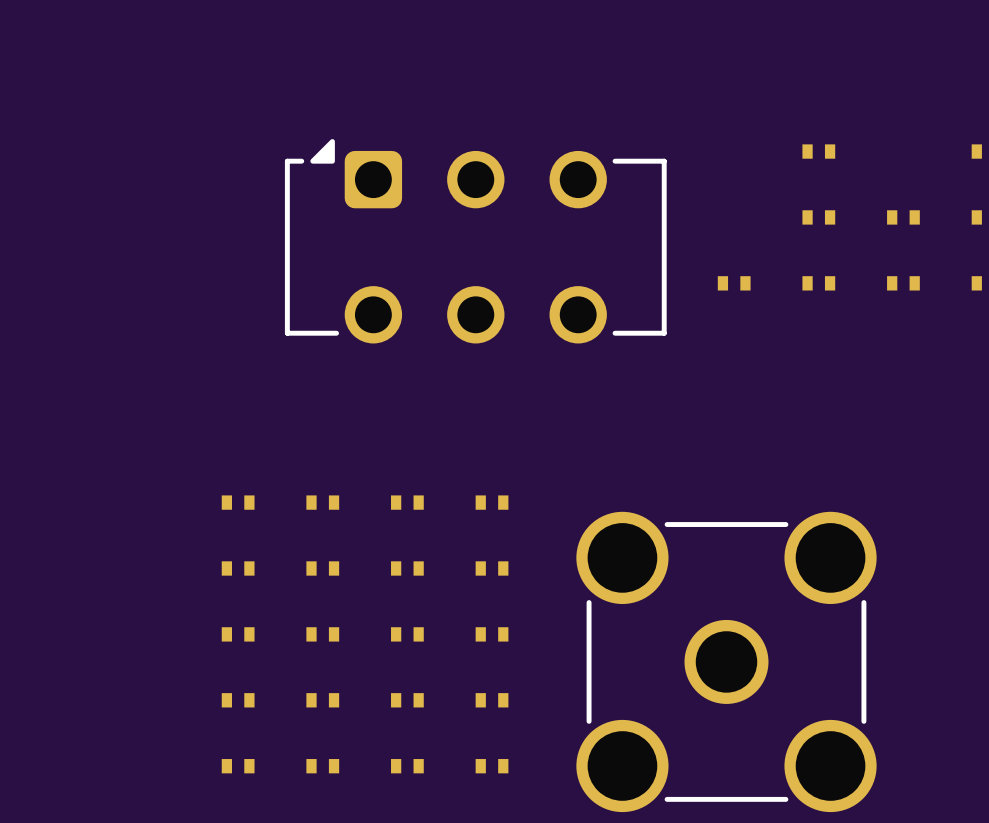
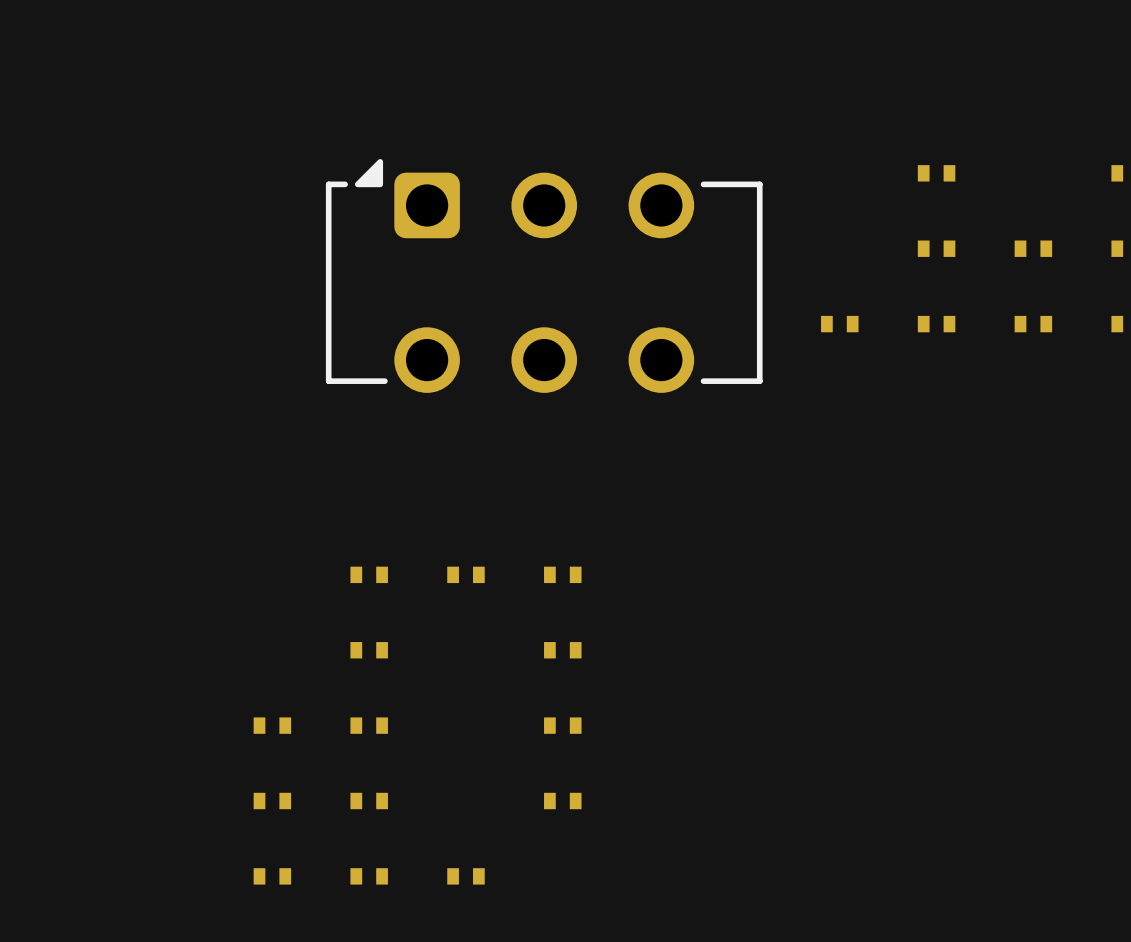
part: (238, 502) -> none
part: (238, 568) -> none
part: (407, 568) -> none
part: (407, 634) -> none
part: (726, 661) -> none
part: (407, 700) -> none
part: (492, 766) -> none

